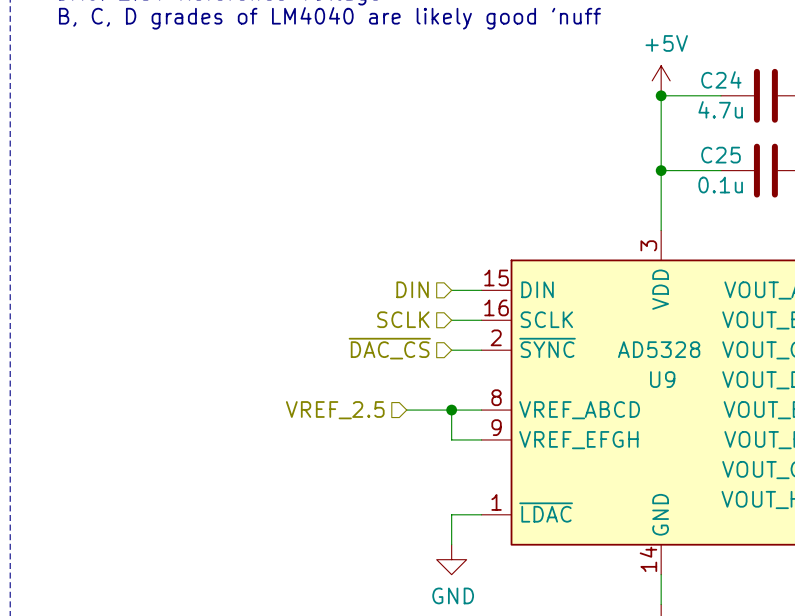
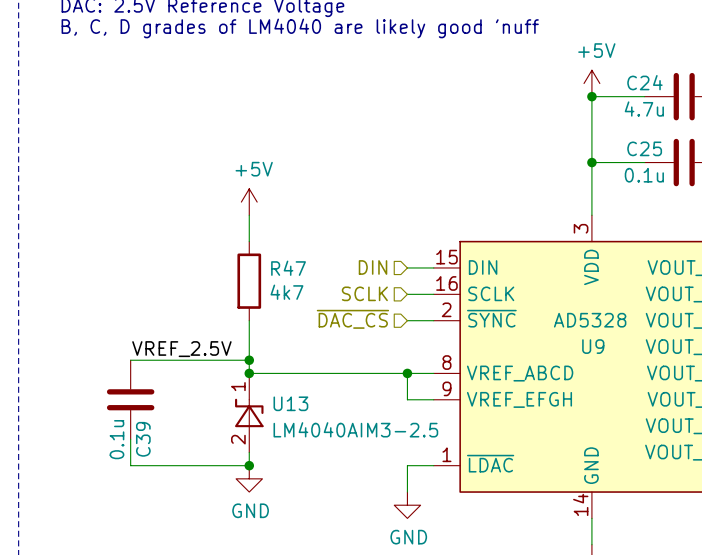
power symbol: none -> +5V (249, 202)
wire: none -> (249, 215) (249, 241)
R47: none -> 4k7 (249, 281)
wire: none -> (249, 320) (249, 373) (367, 373)
label: none -> VREF_2.5V (181, 349)
wire: none -> (130, 360) (249, 360)
junction: none -> (249, 360)
junction: none -> (249, 373)
hierarchical label: VREF_2.5 (335, 410) -> none
C39: none -> 0.1u (130, 399)
U13: none -> LM4040AIM3-2.5 (249, 412)
wire: none -> (130, 439) (130, 465) (249, 465) (249, 452)
junction: none -> (249, 465)
power symbol: none -> GND (249, 478)

